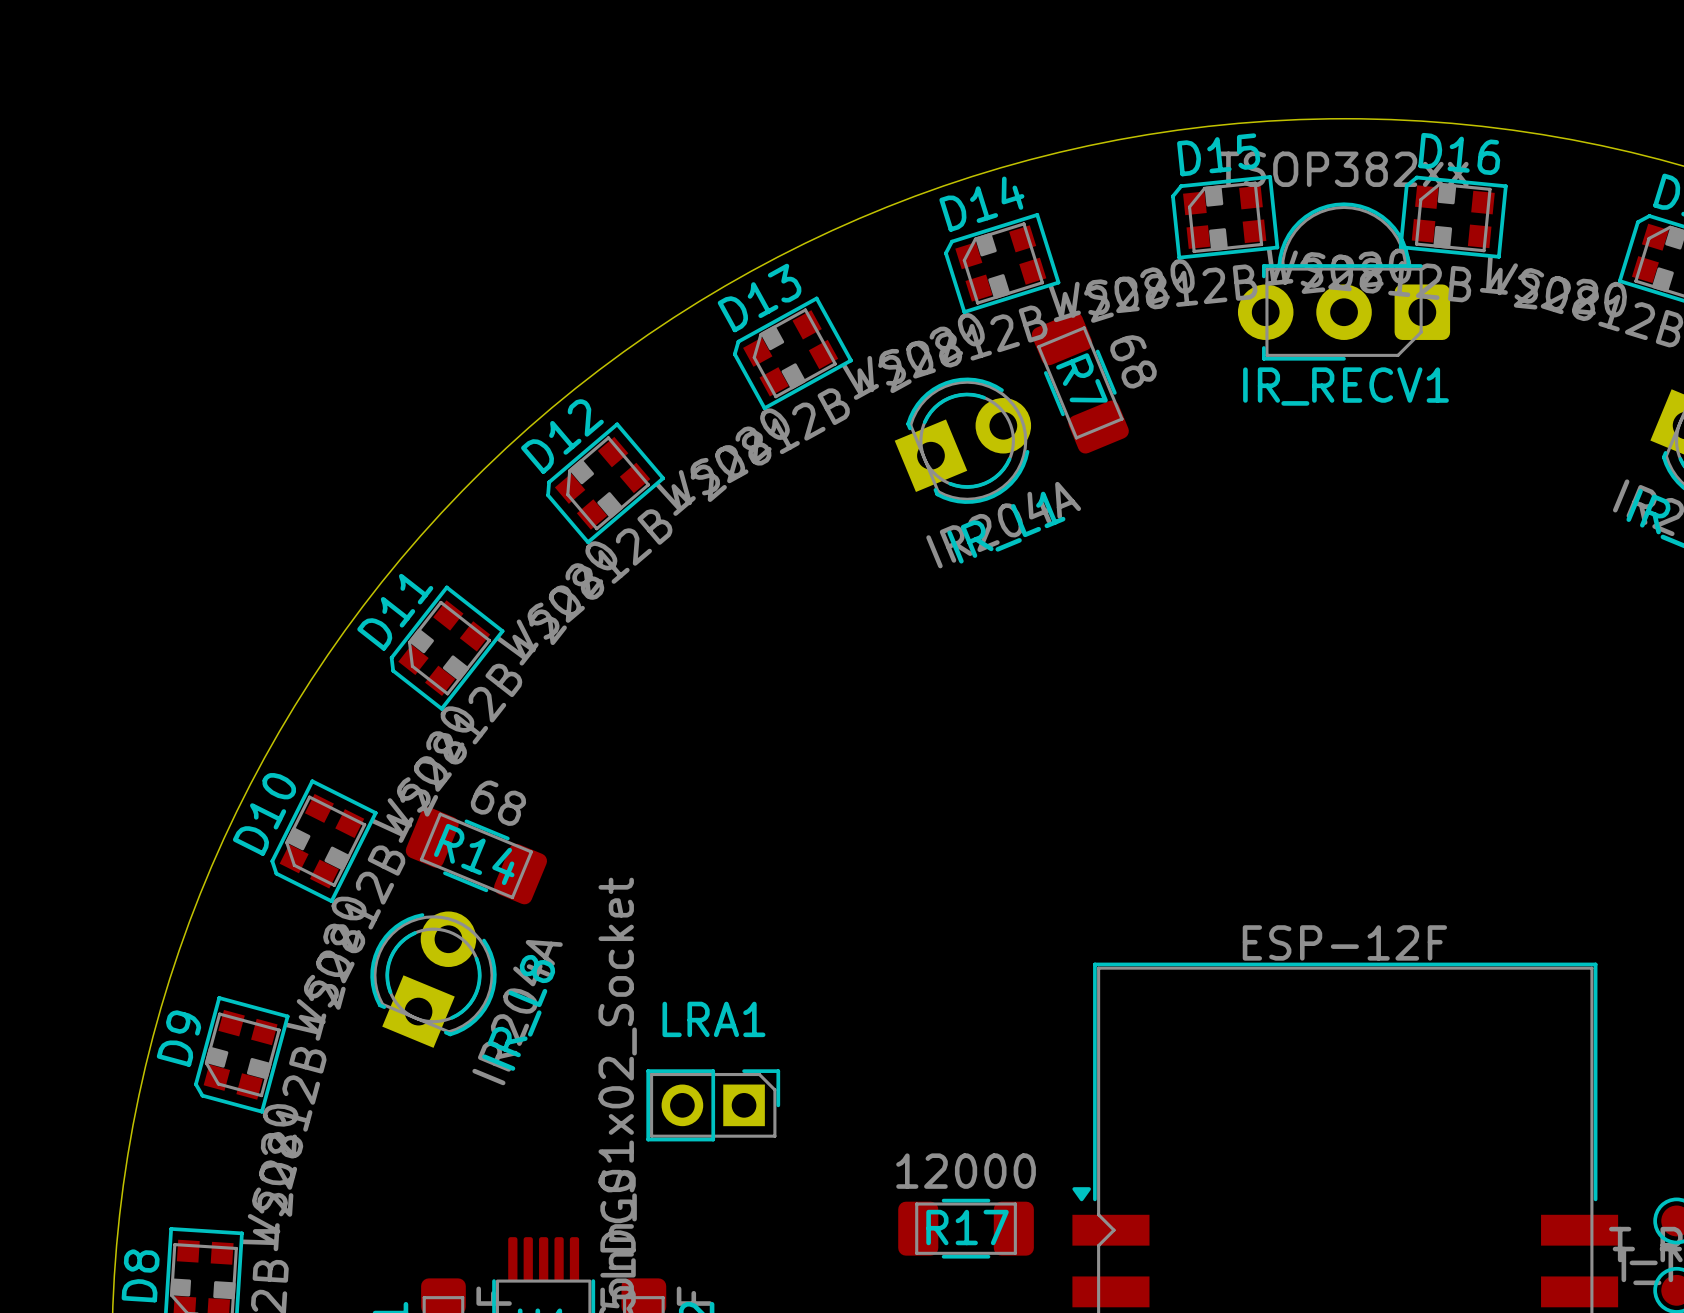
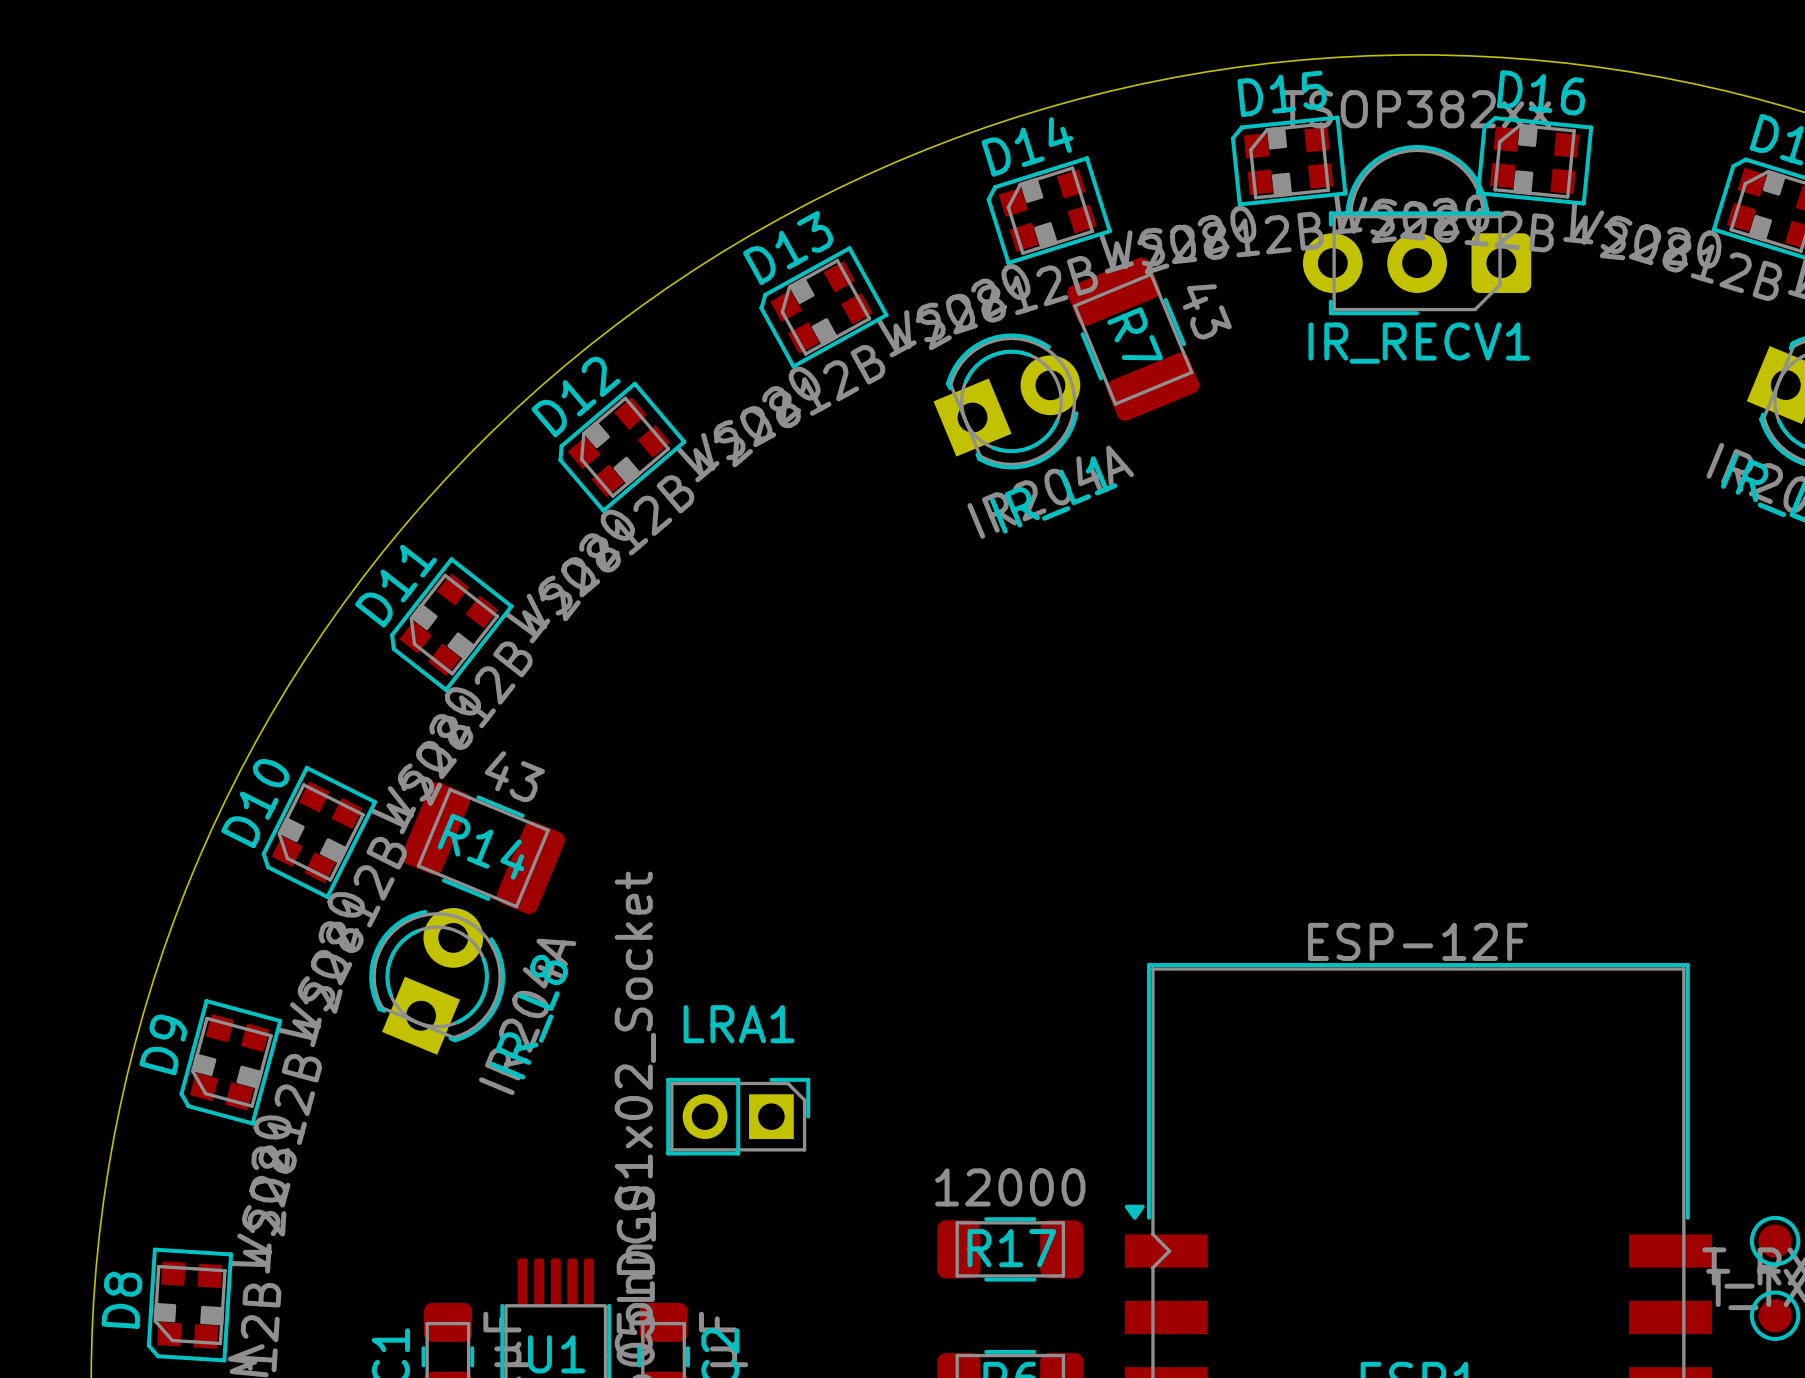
R7 footprint: [1031, 312, 1129, 454] -> [1067, 257, 1200, 421]
R7 value: 68 (1133, 361) -> 43 (1207, 311)
R14 value: 68 (498, 803) -> 43 (514, 776)
R14 footprint: [405, 807, 548, 905] -> [401, 782, 566, 915]

